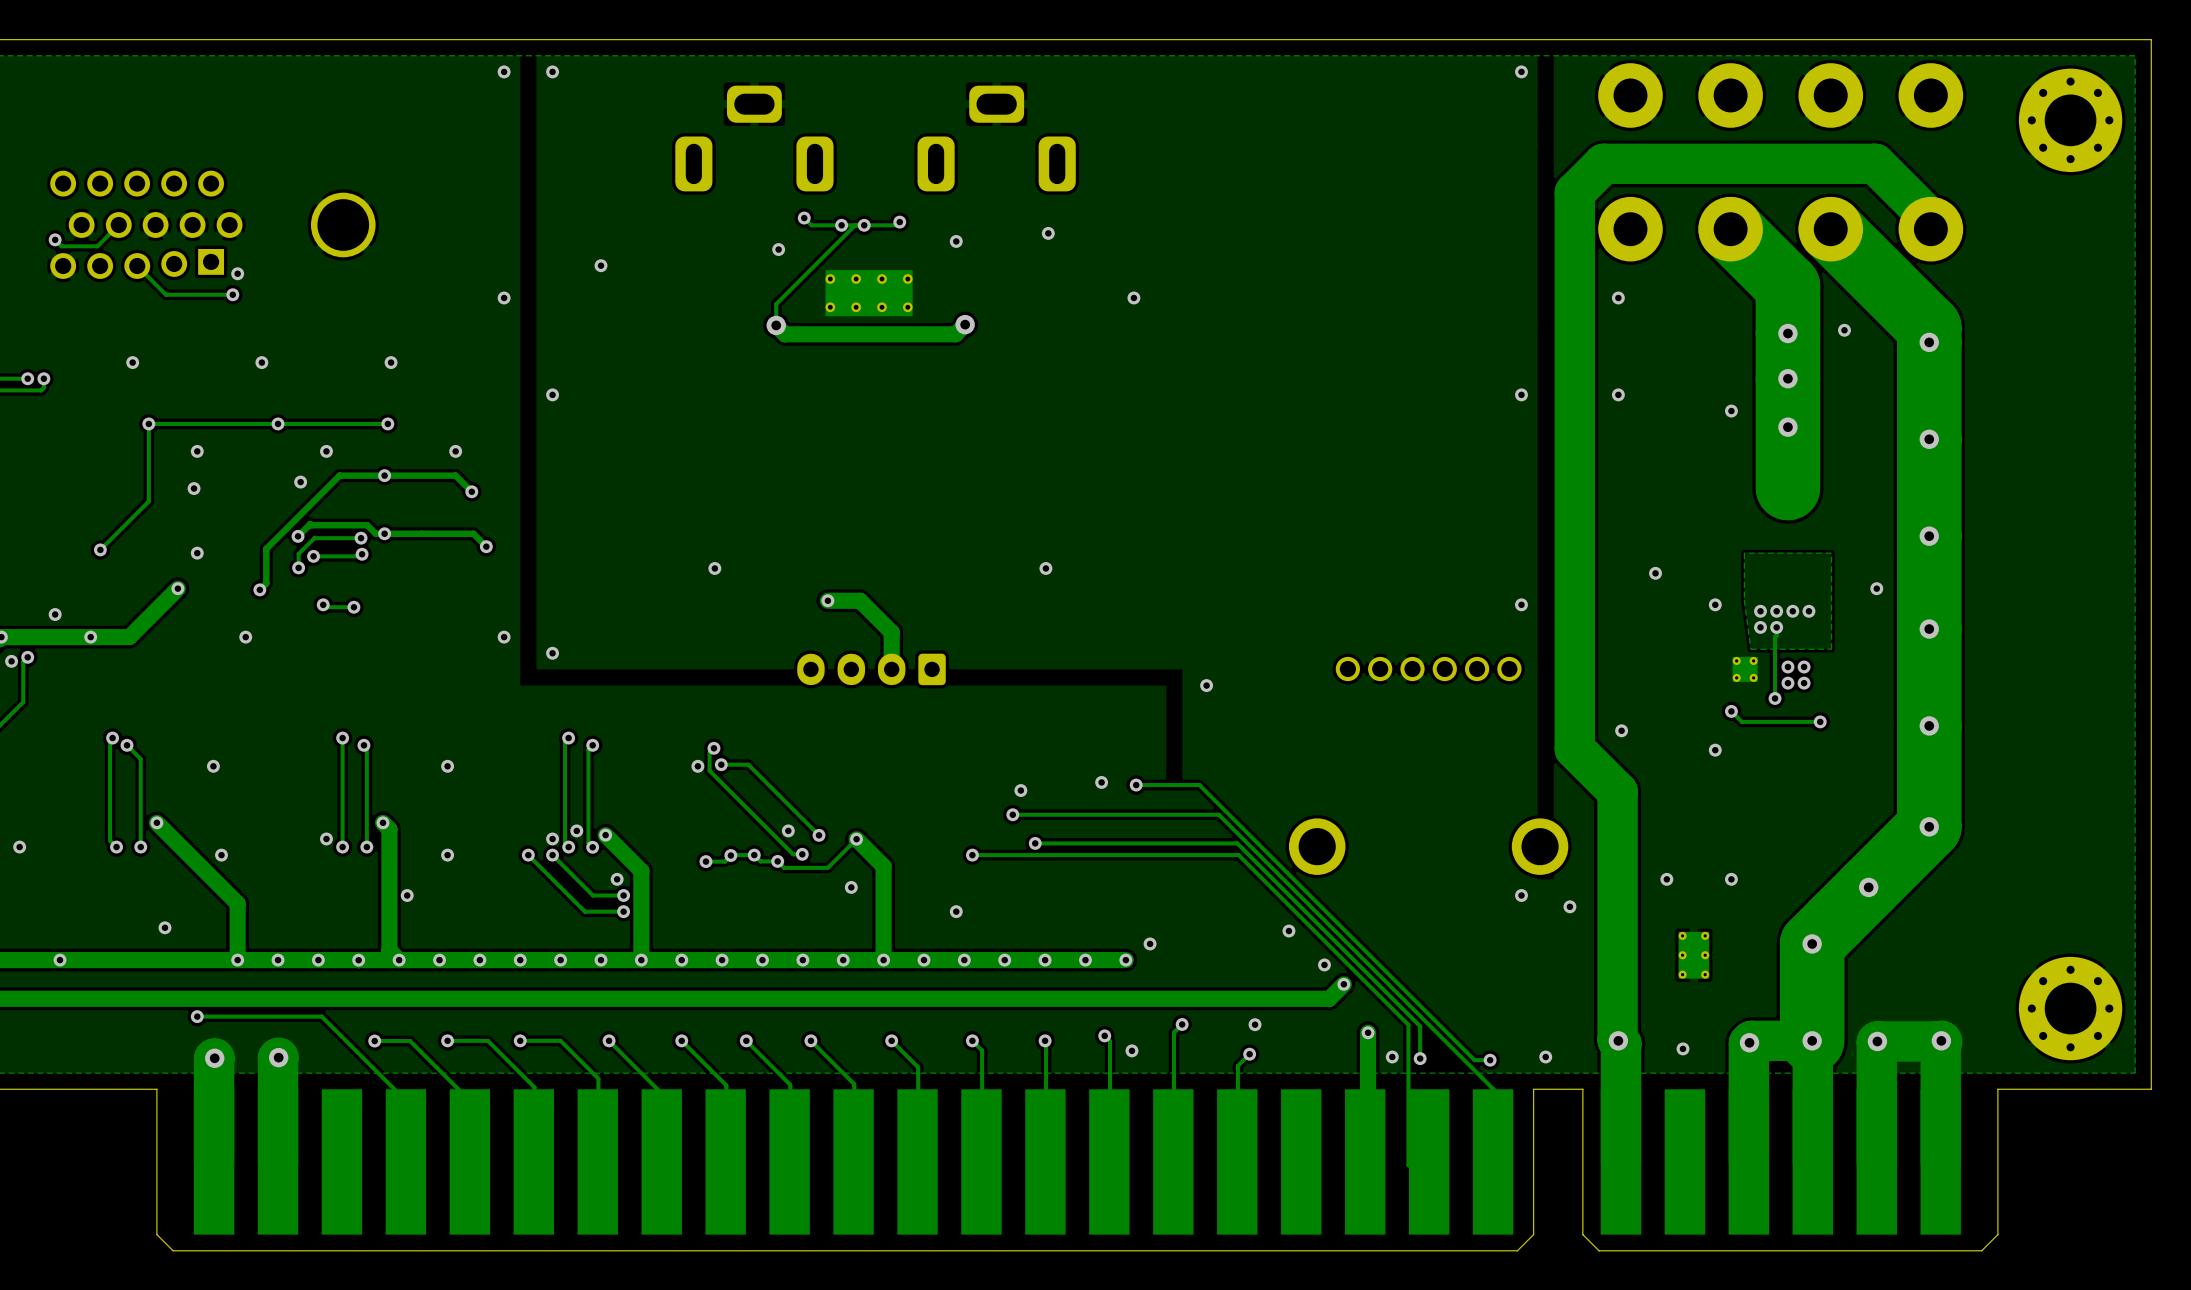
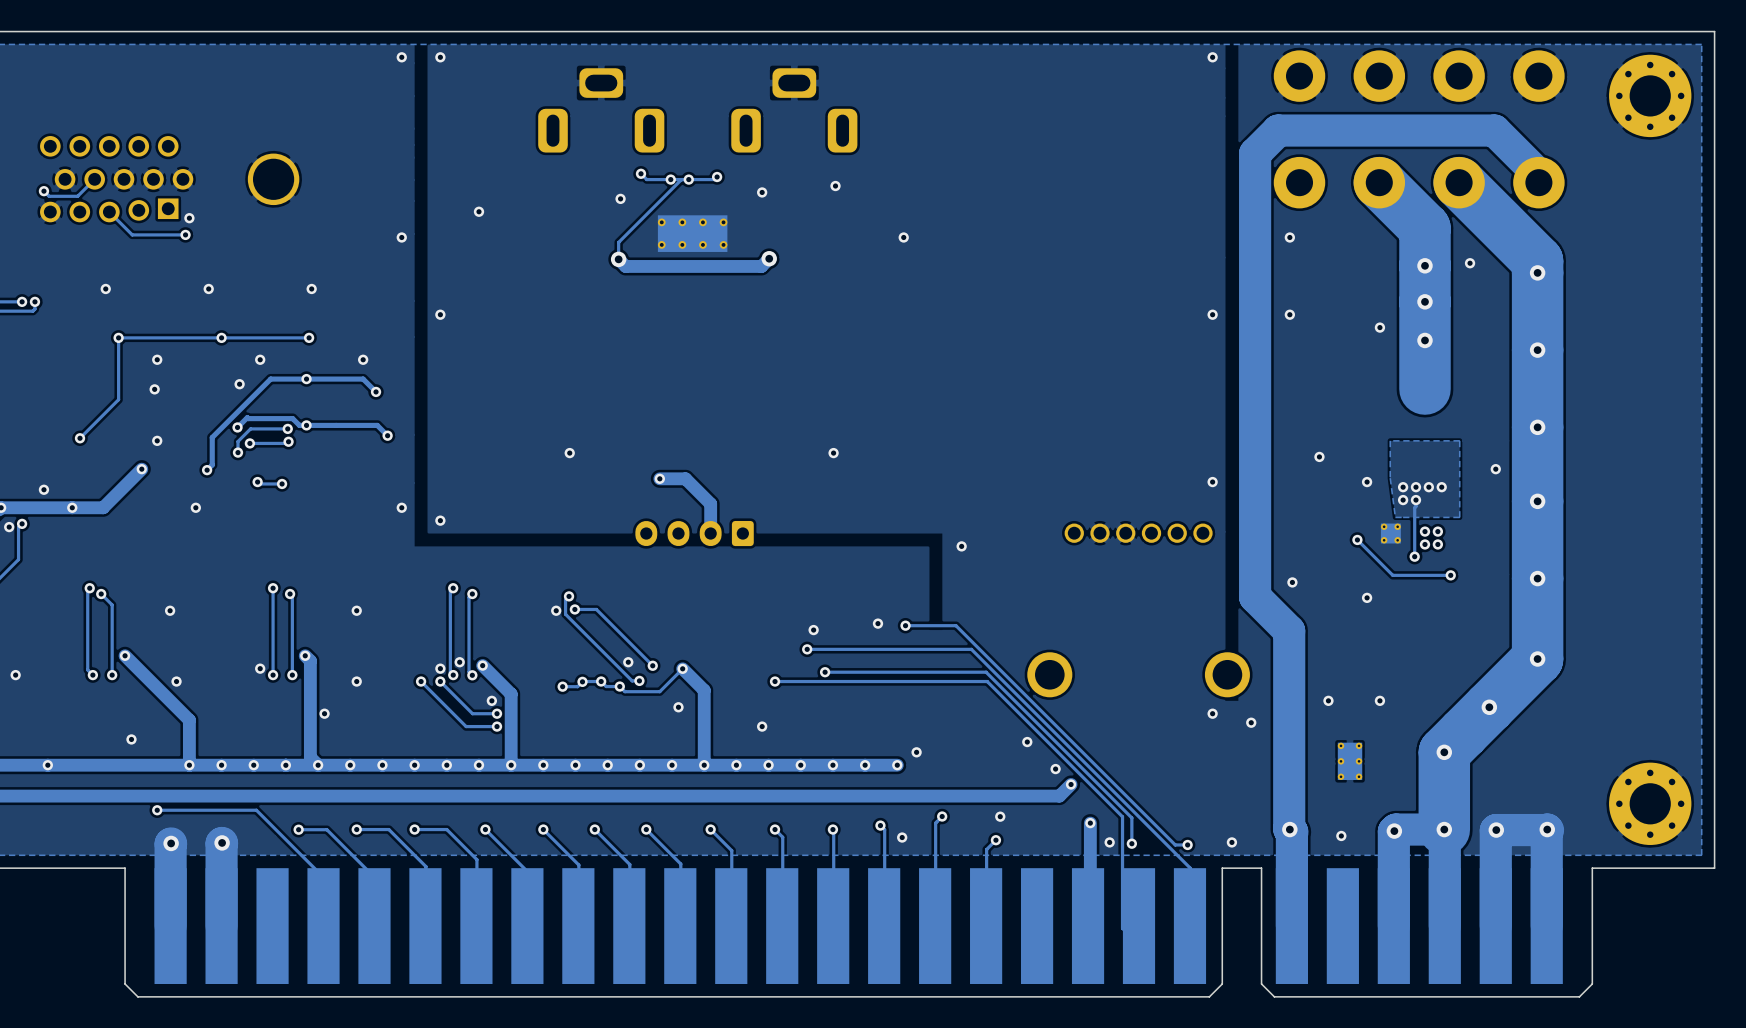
track: (1731, 711) (1741, 721) (1747, 721) -> (1357, 539) (1392, 575)
via position: (1731, 711) -> (1357, 539)

